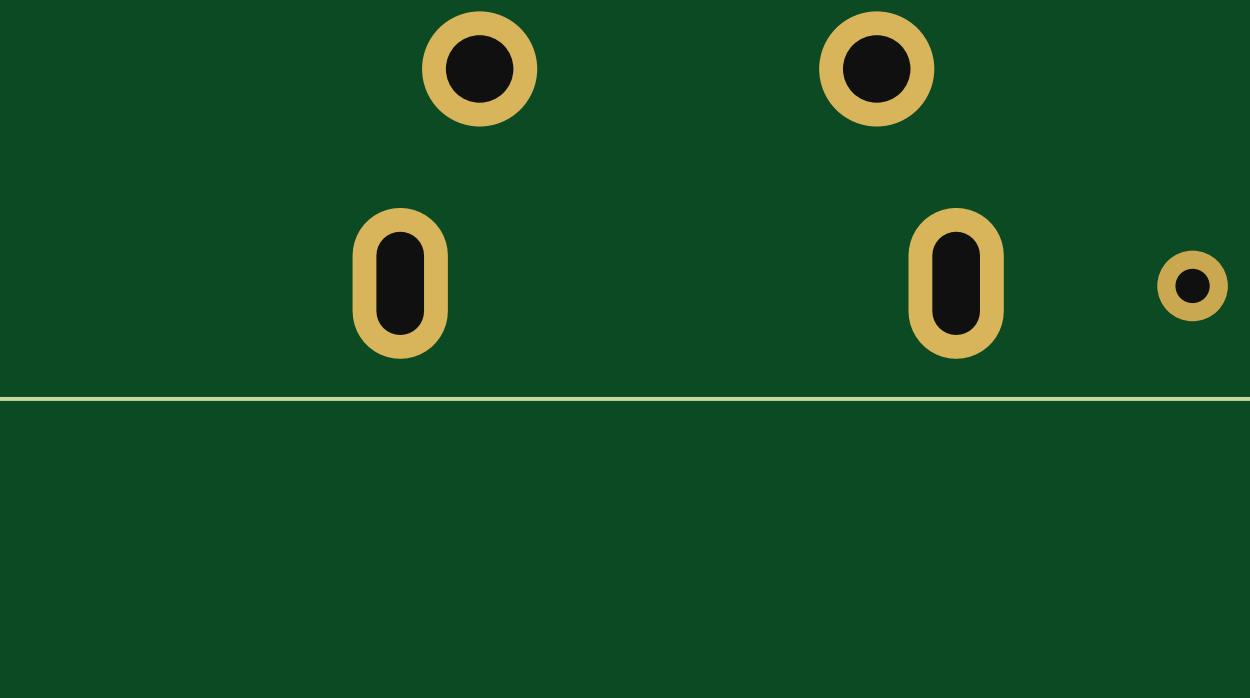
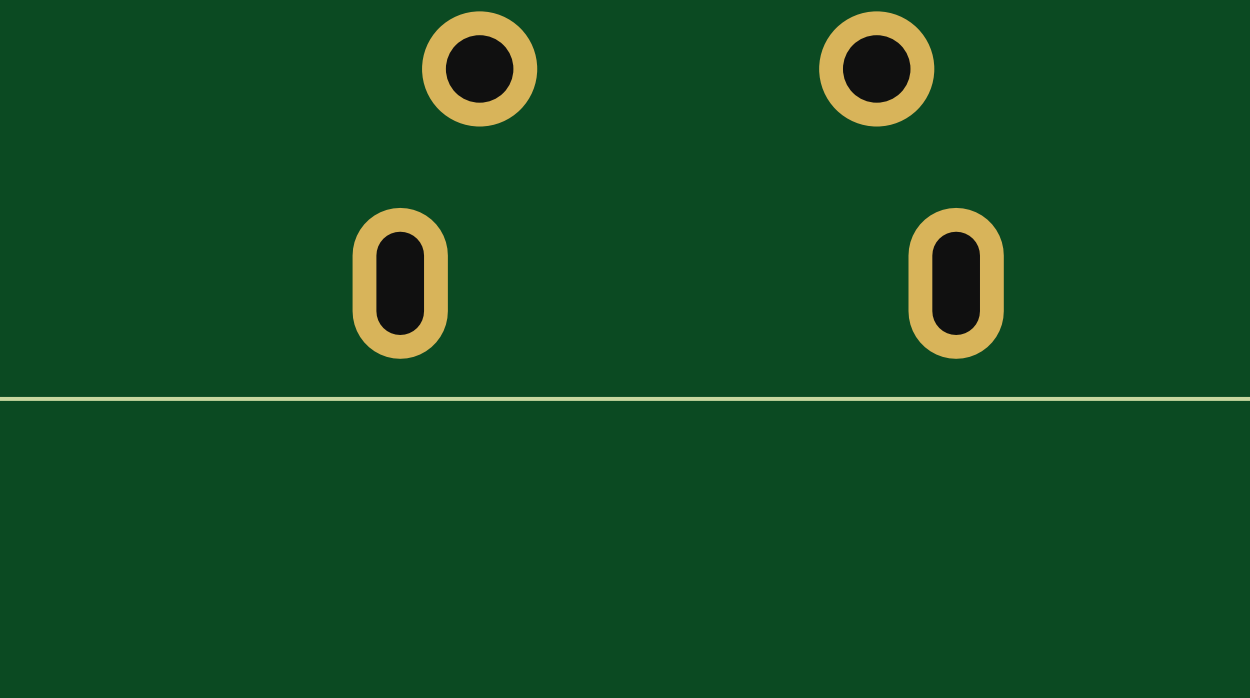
via: (1192, 285) -> none

